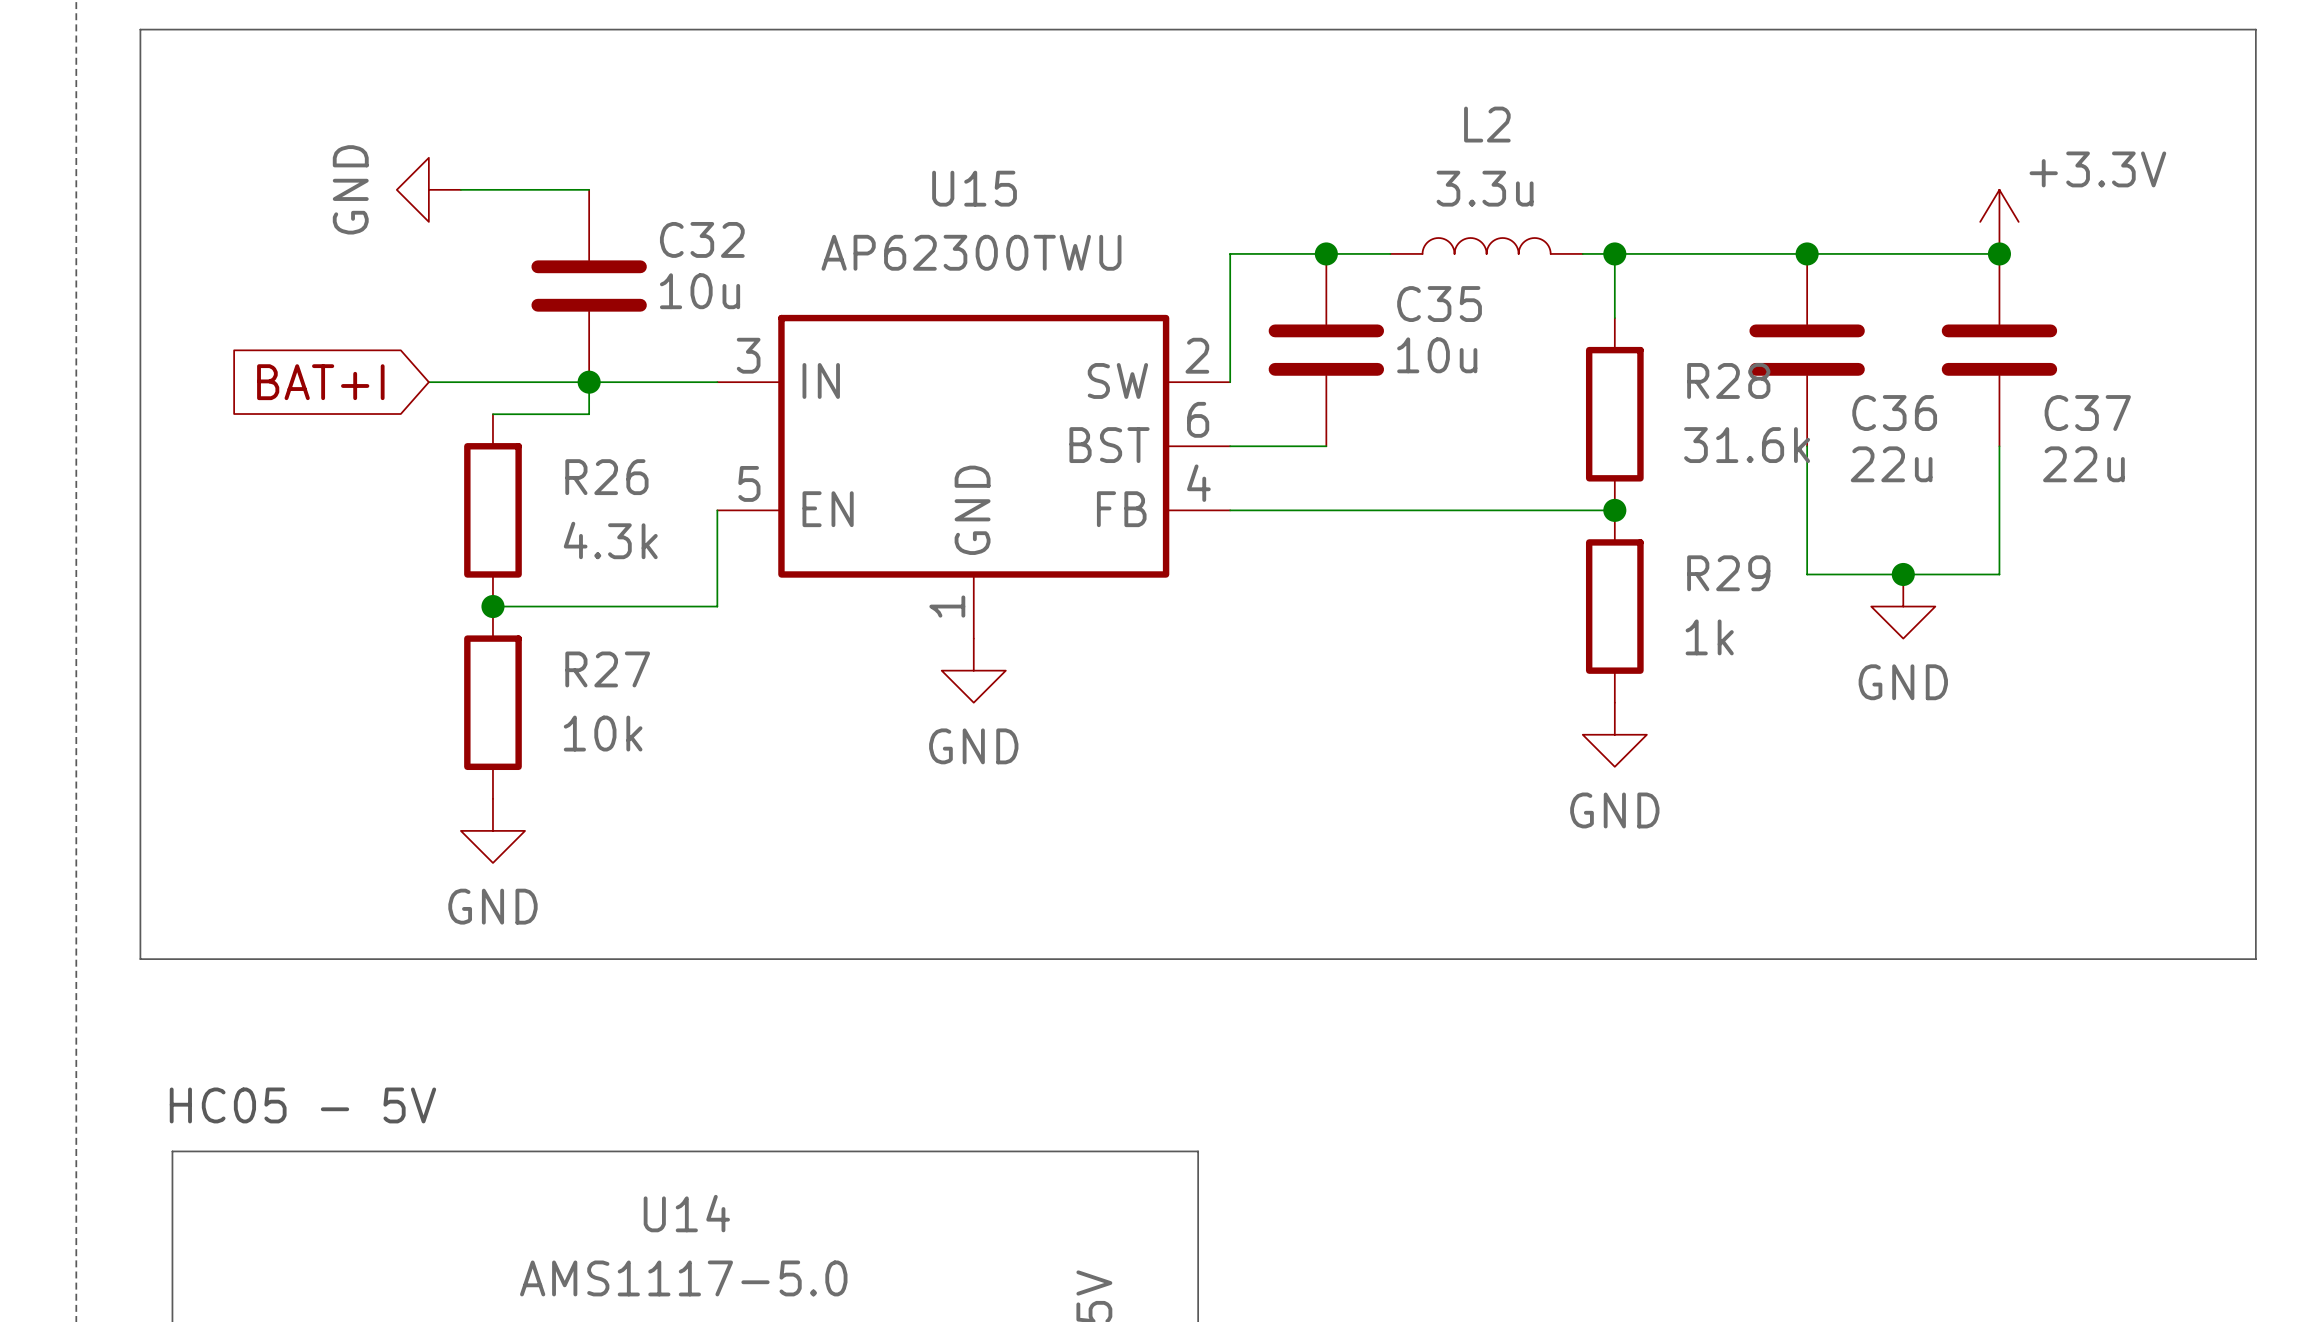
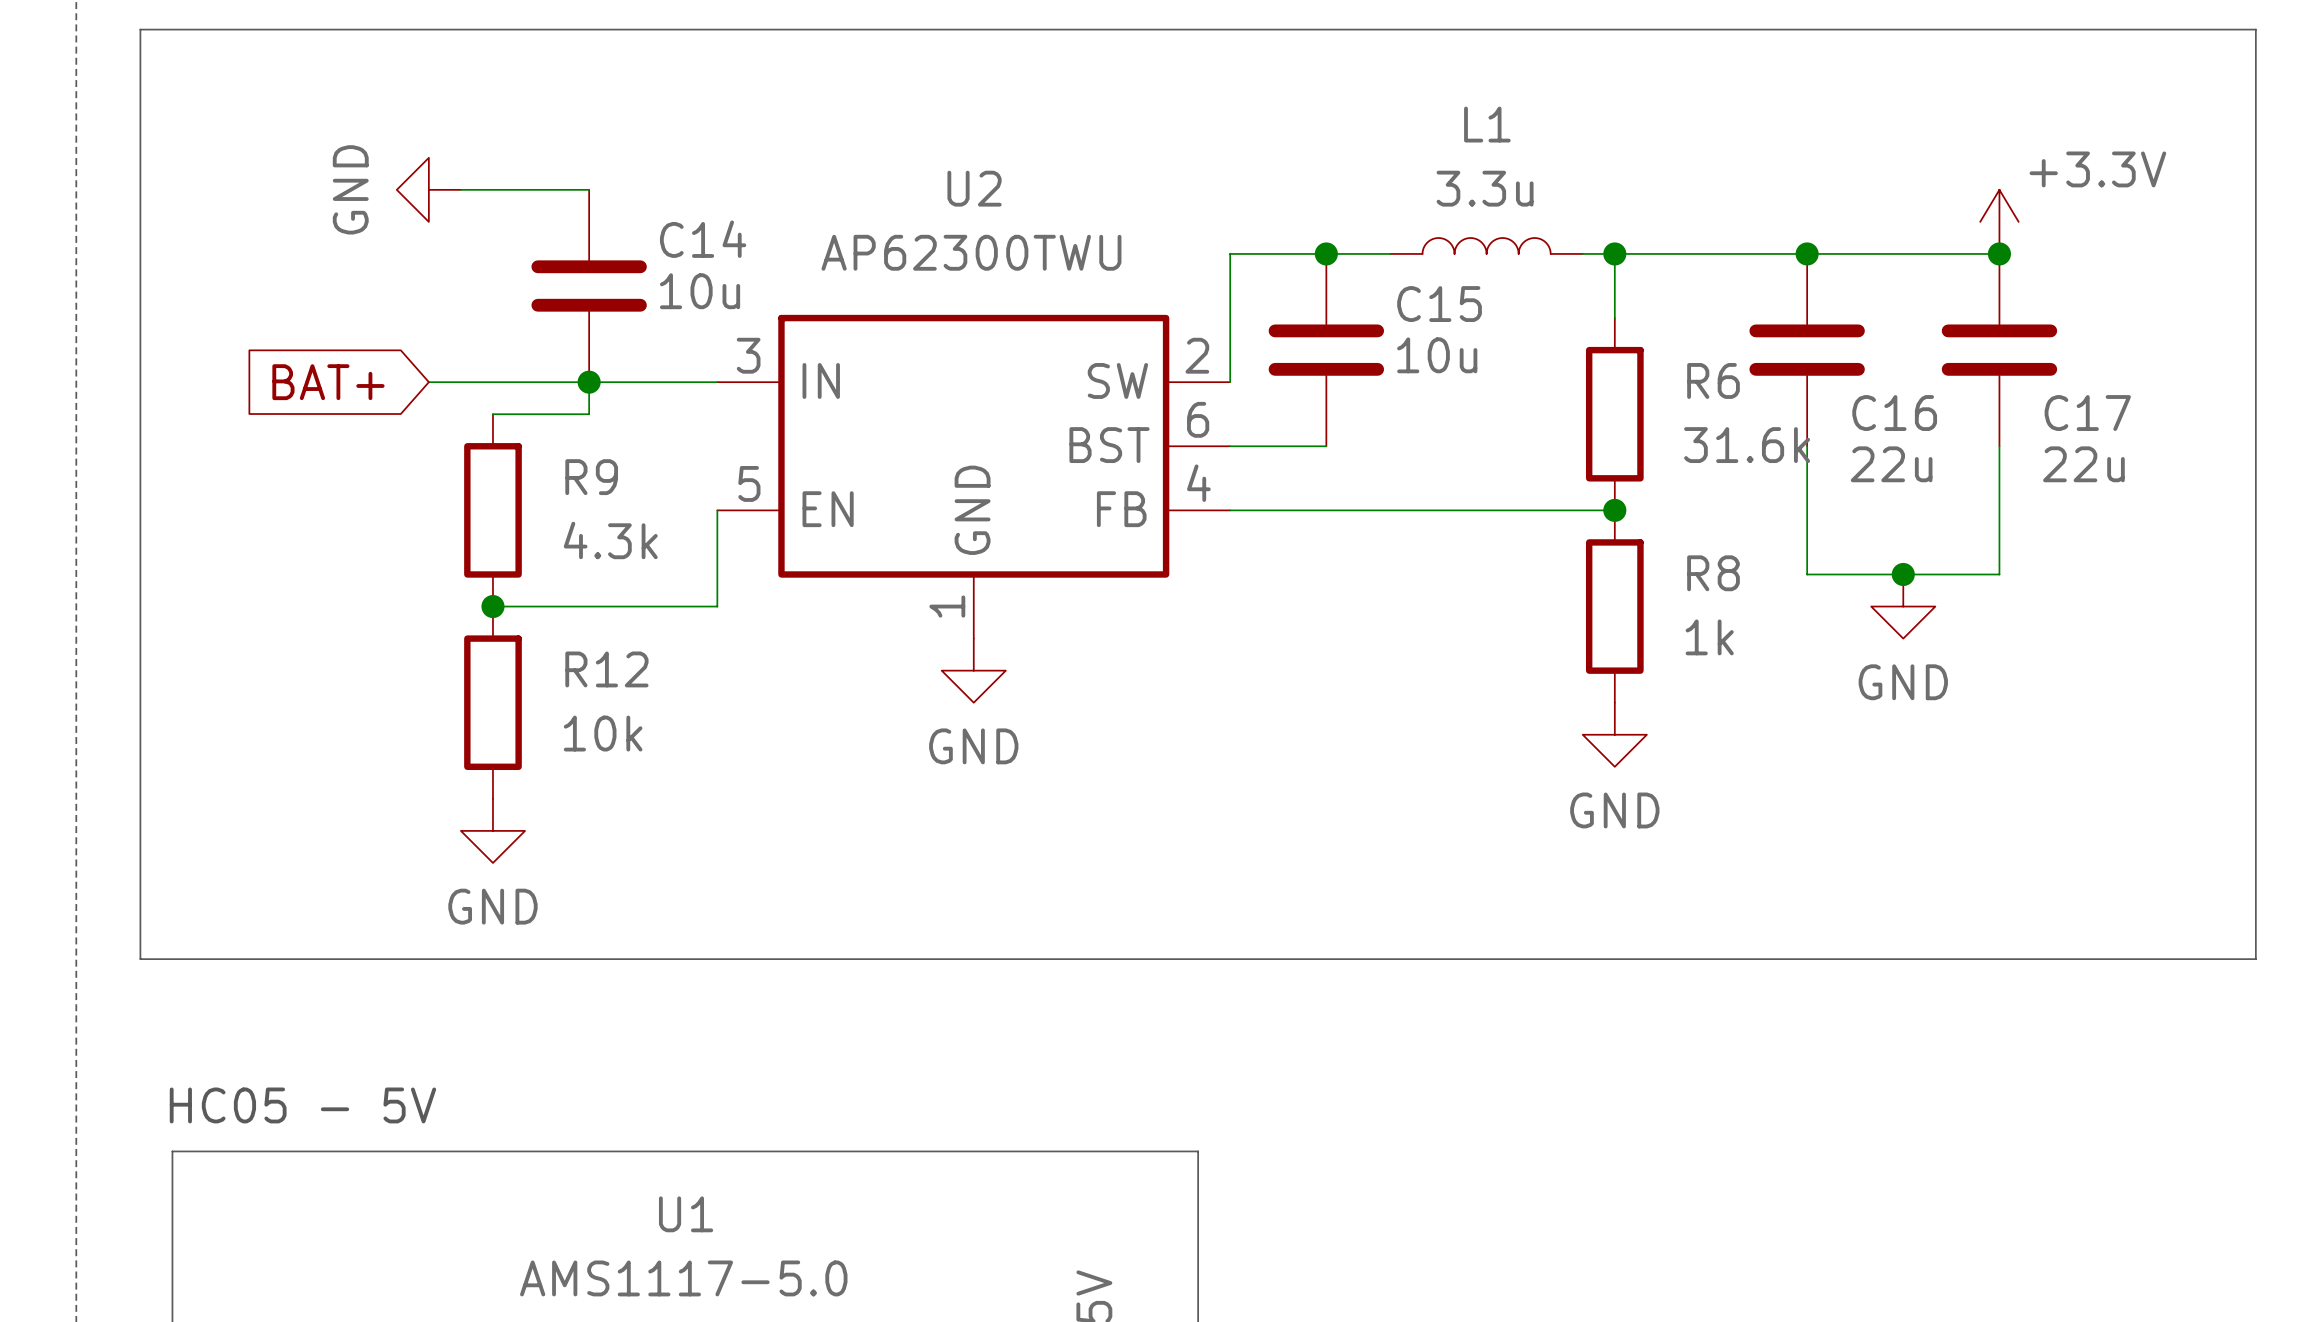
L2 name: L2 (1487, 124) -> L1 (1487, 124)
U15 name: U15 (974, 188) -> U2 (974, 188)
C32 name: C32 (702, 239) -> C14 (703, 239)
C35 name: C35 (1439, 304) -> C15 (1439, 304)
R28 name: R28 (1728, 380) -> R6 (1713, 380)
global label: BAT+I (320, 382) -> BAT+ (328, 382)
C36 name: C36 (1894, 413) -> C16 (1894, 413)
C37 name: C37 (2087, 413) -> C17 (2087, 413)
R26 name: R26 (606, 477) -> R9 (591, 477)
R29 name: R29 (1728, 573) -> R8 (1713, 573)
R27 name: R27 (607, 669) -> R12 (606, 669)
U14 name: U14 (686, 1213) -> U1 (686, 1214)

